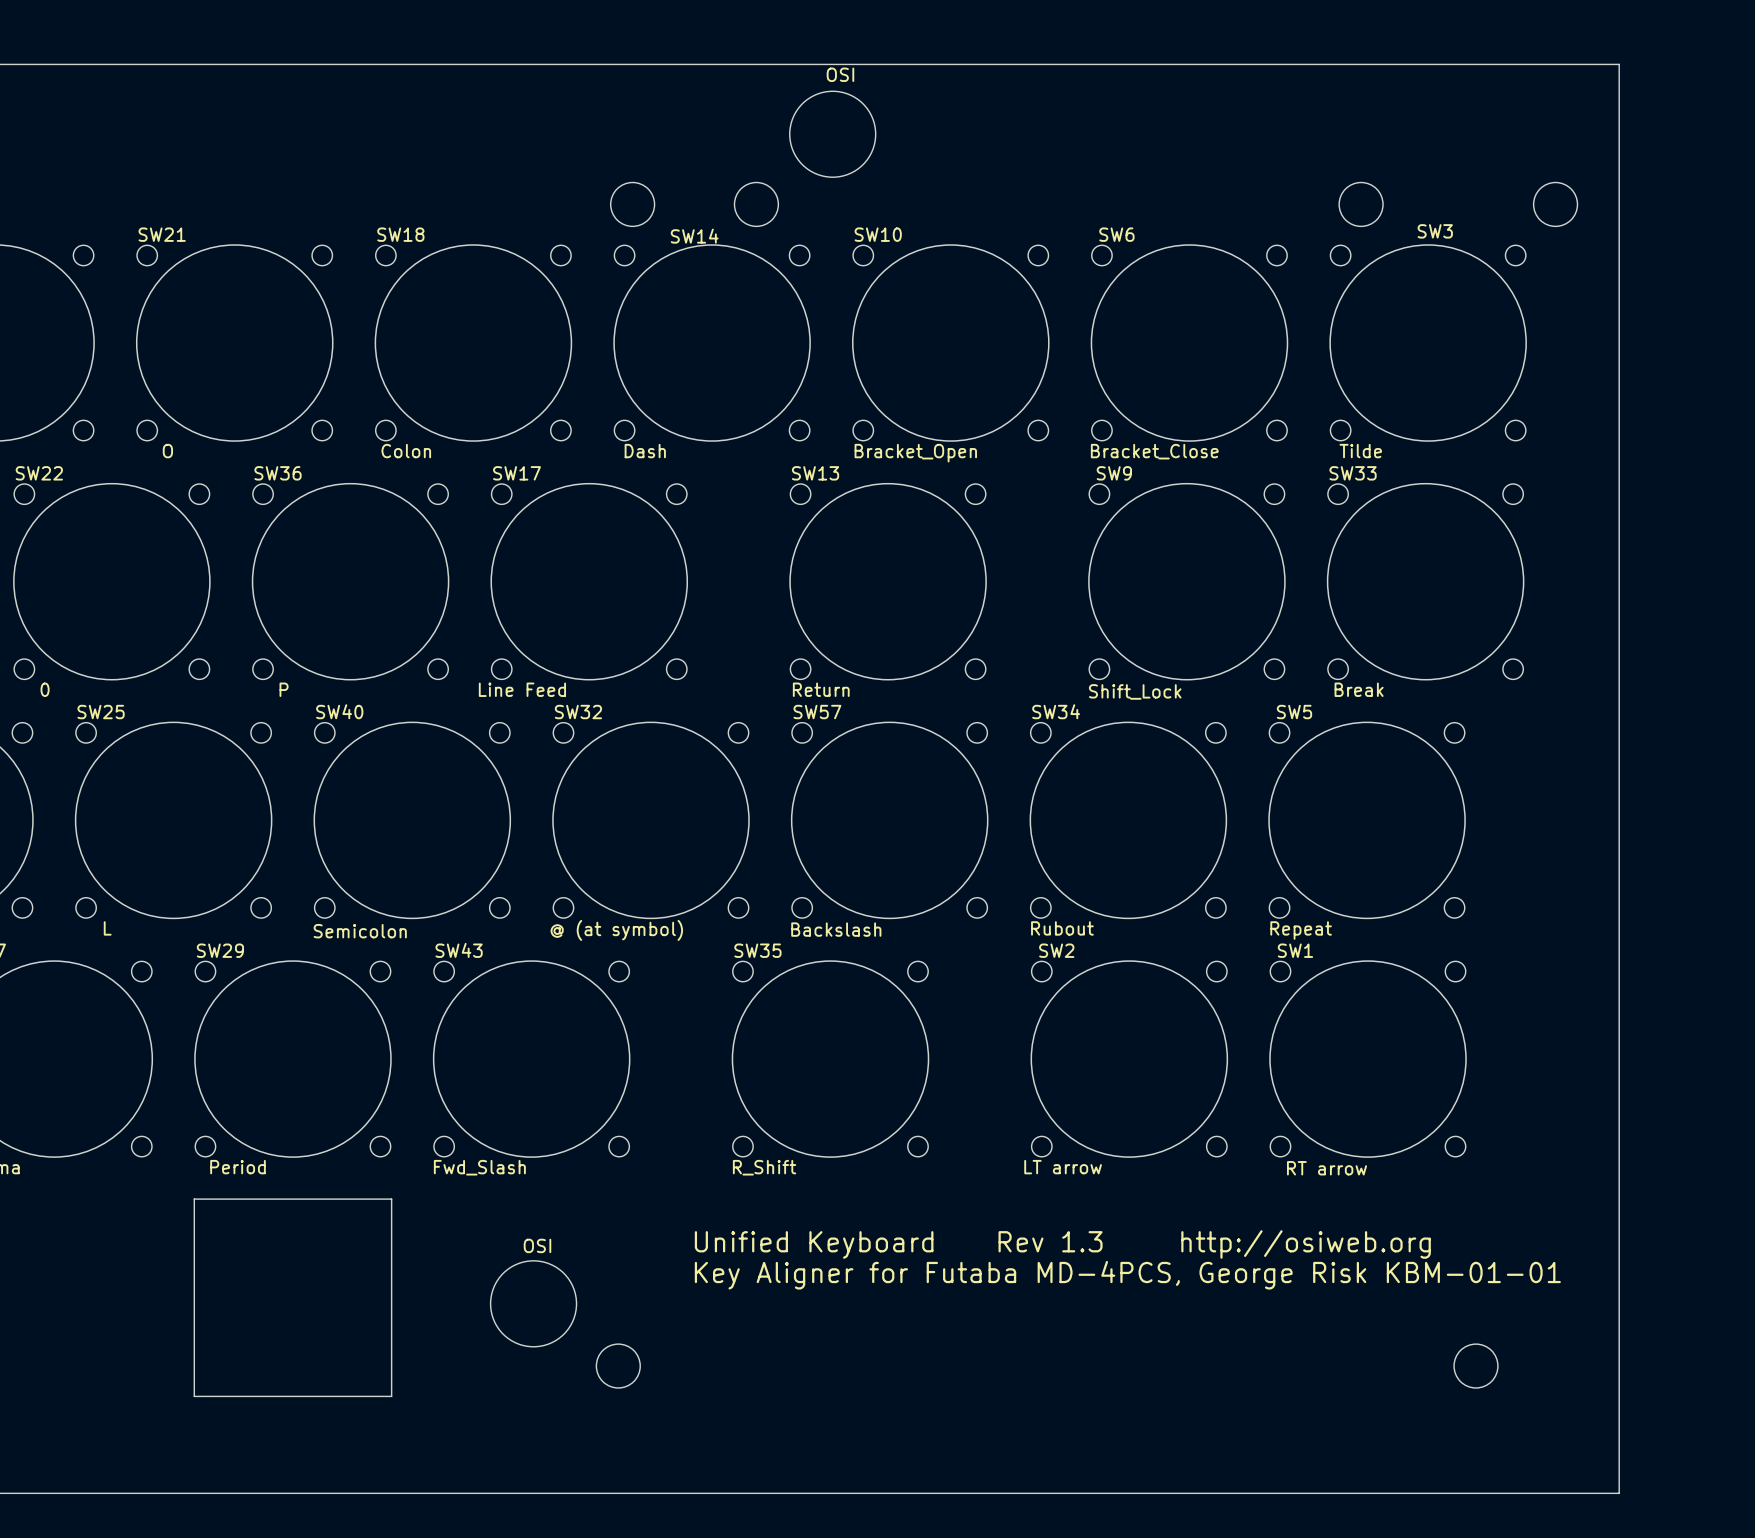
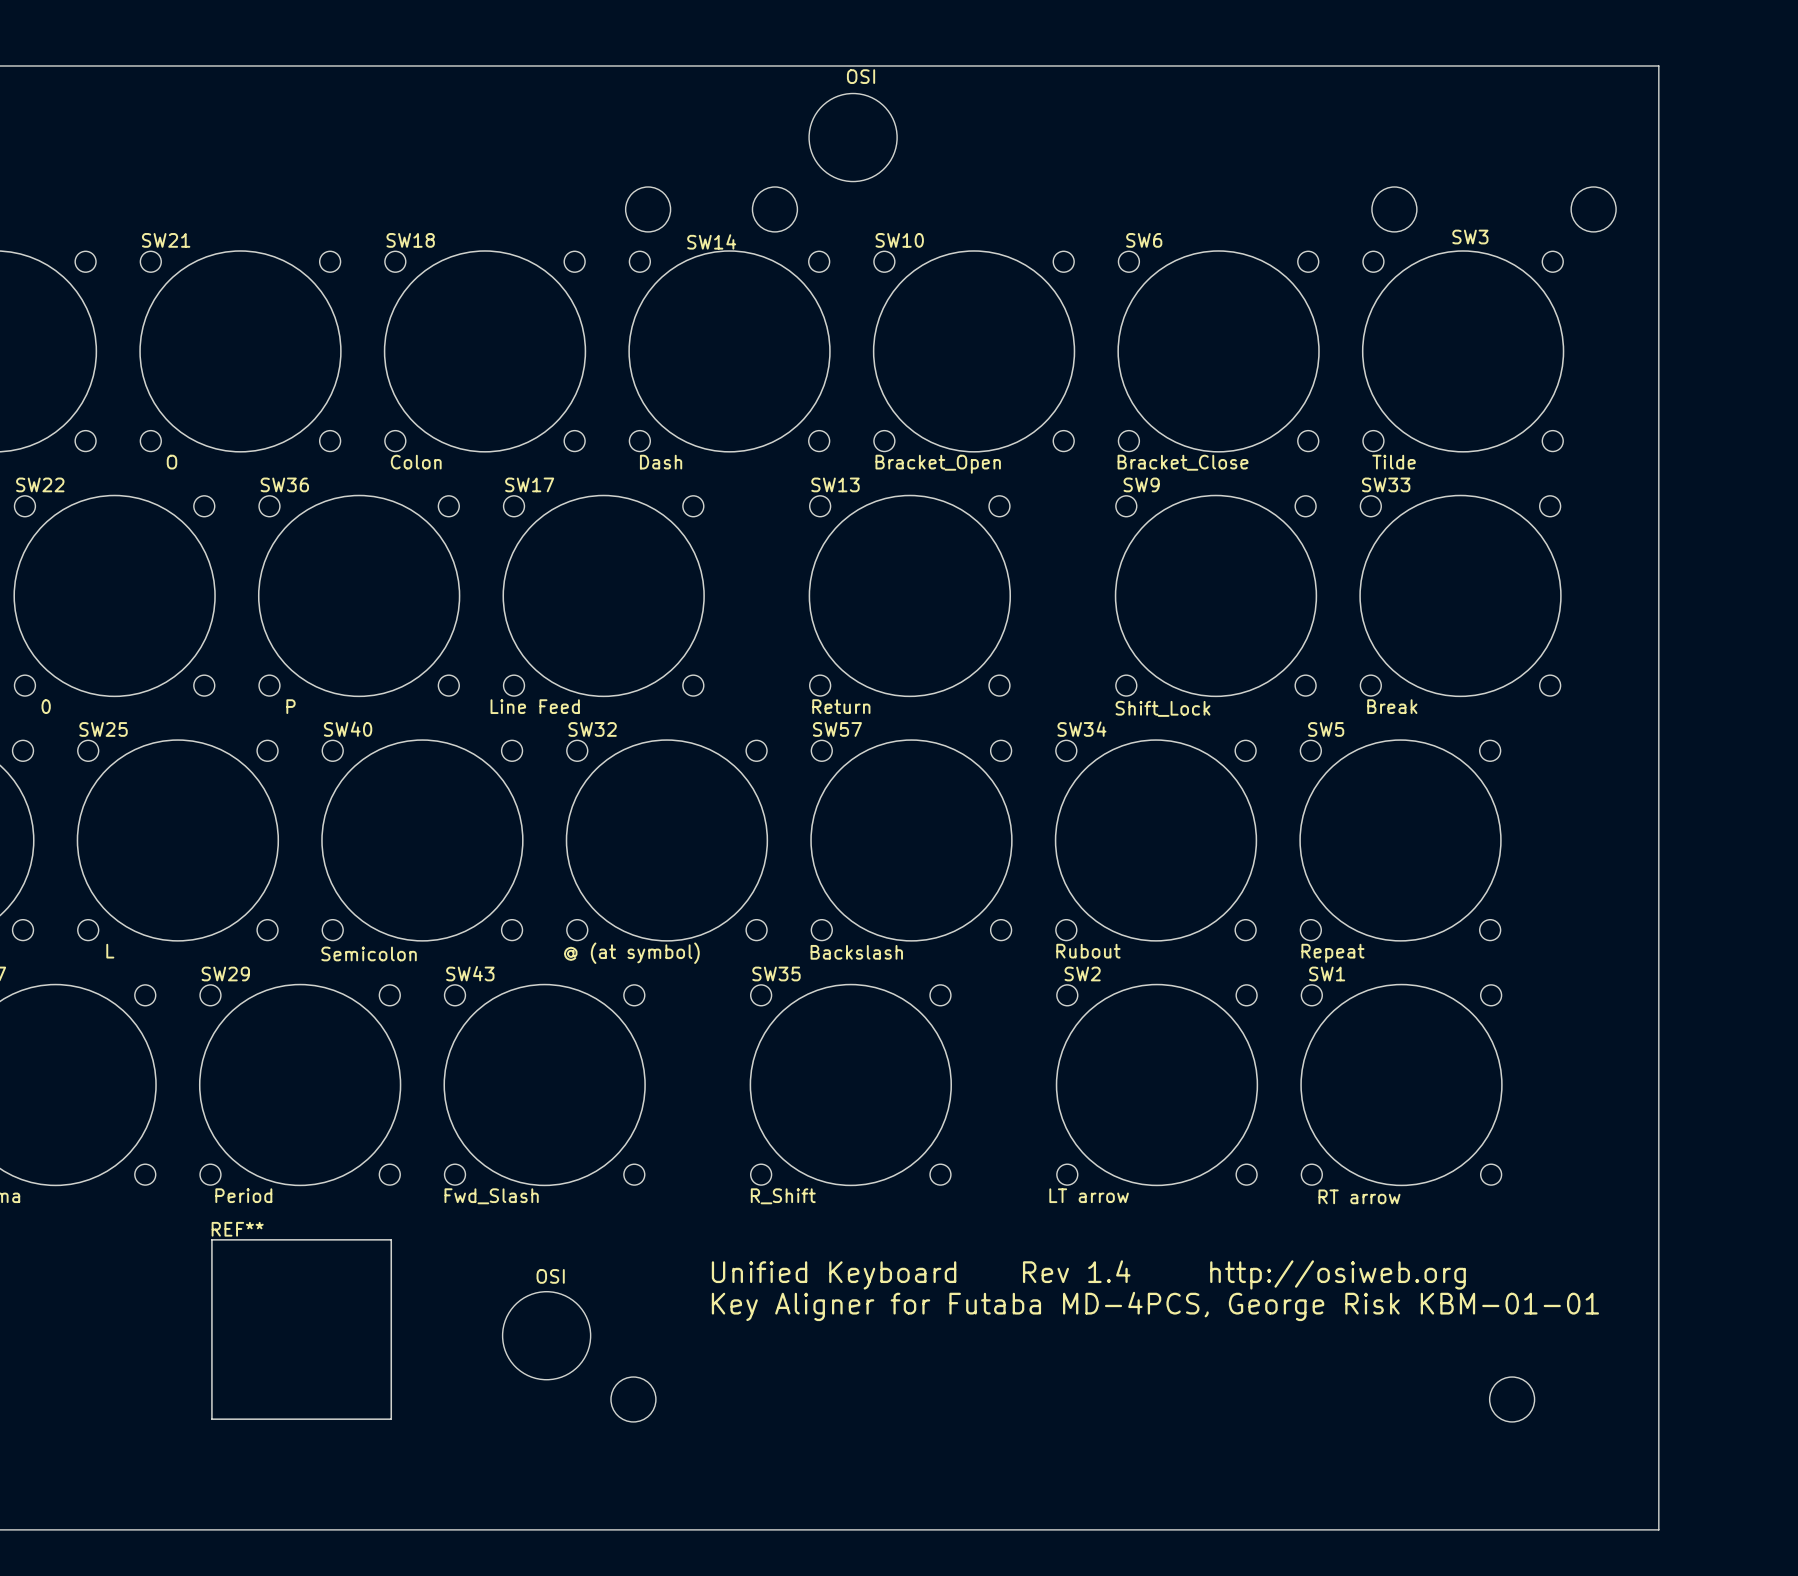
board edge: (194, 1199) (194, 1396) (391, 1396) (391, 1199) (194, 1199) -> none
text: Unified Keyboard Rev 1.3 http://osiweb.org (1062, 1244) -> Unified Keyboard Rev 1.4 http://osiweb.org (1088, 1274)
REF**: none -> (301, 1329)

